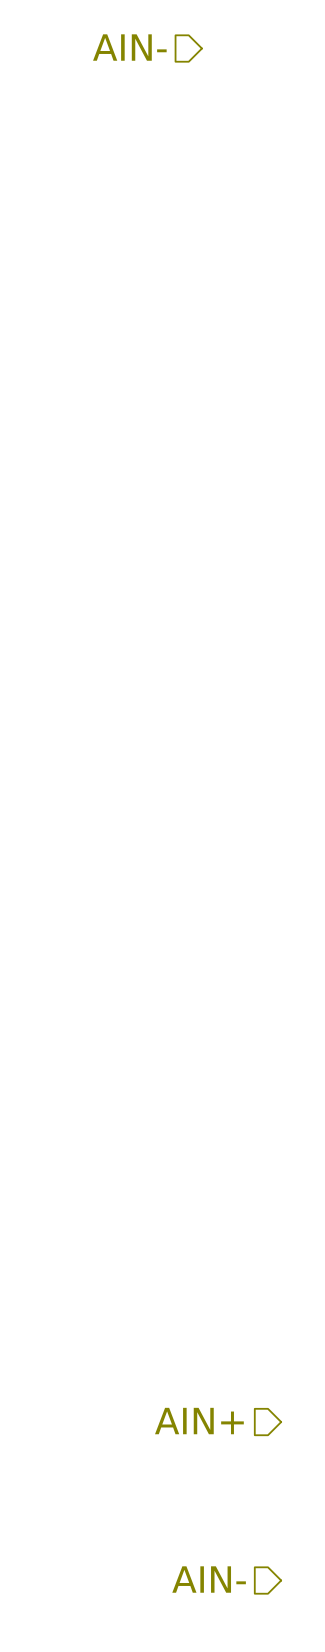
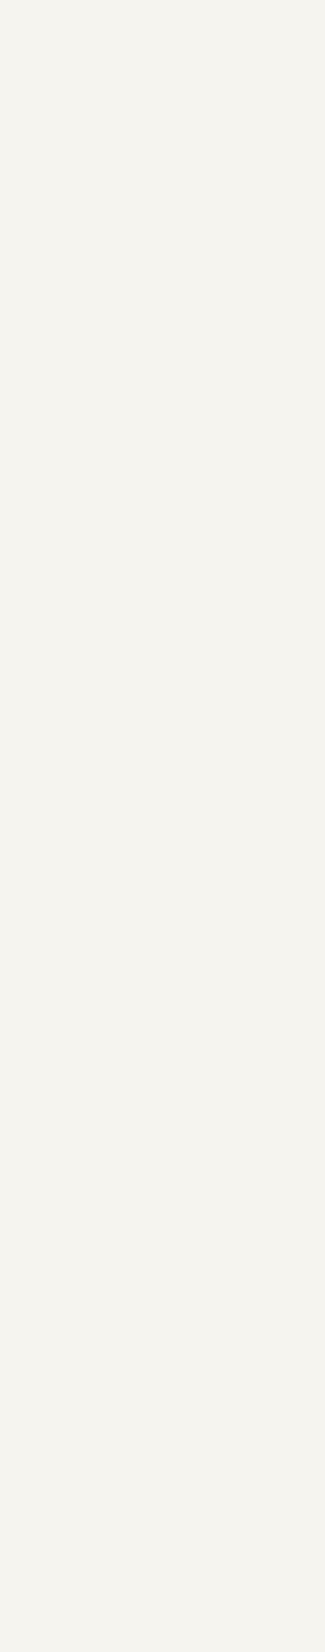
hierarchical label: AIN- (129, 47) -> none
hierarchical label: AIN+ (199, 1421) -> none
hierarchical label: AIN- (209, 1579) -> none

